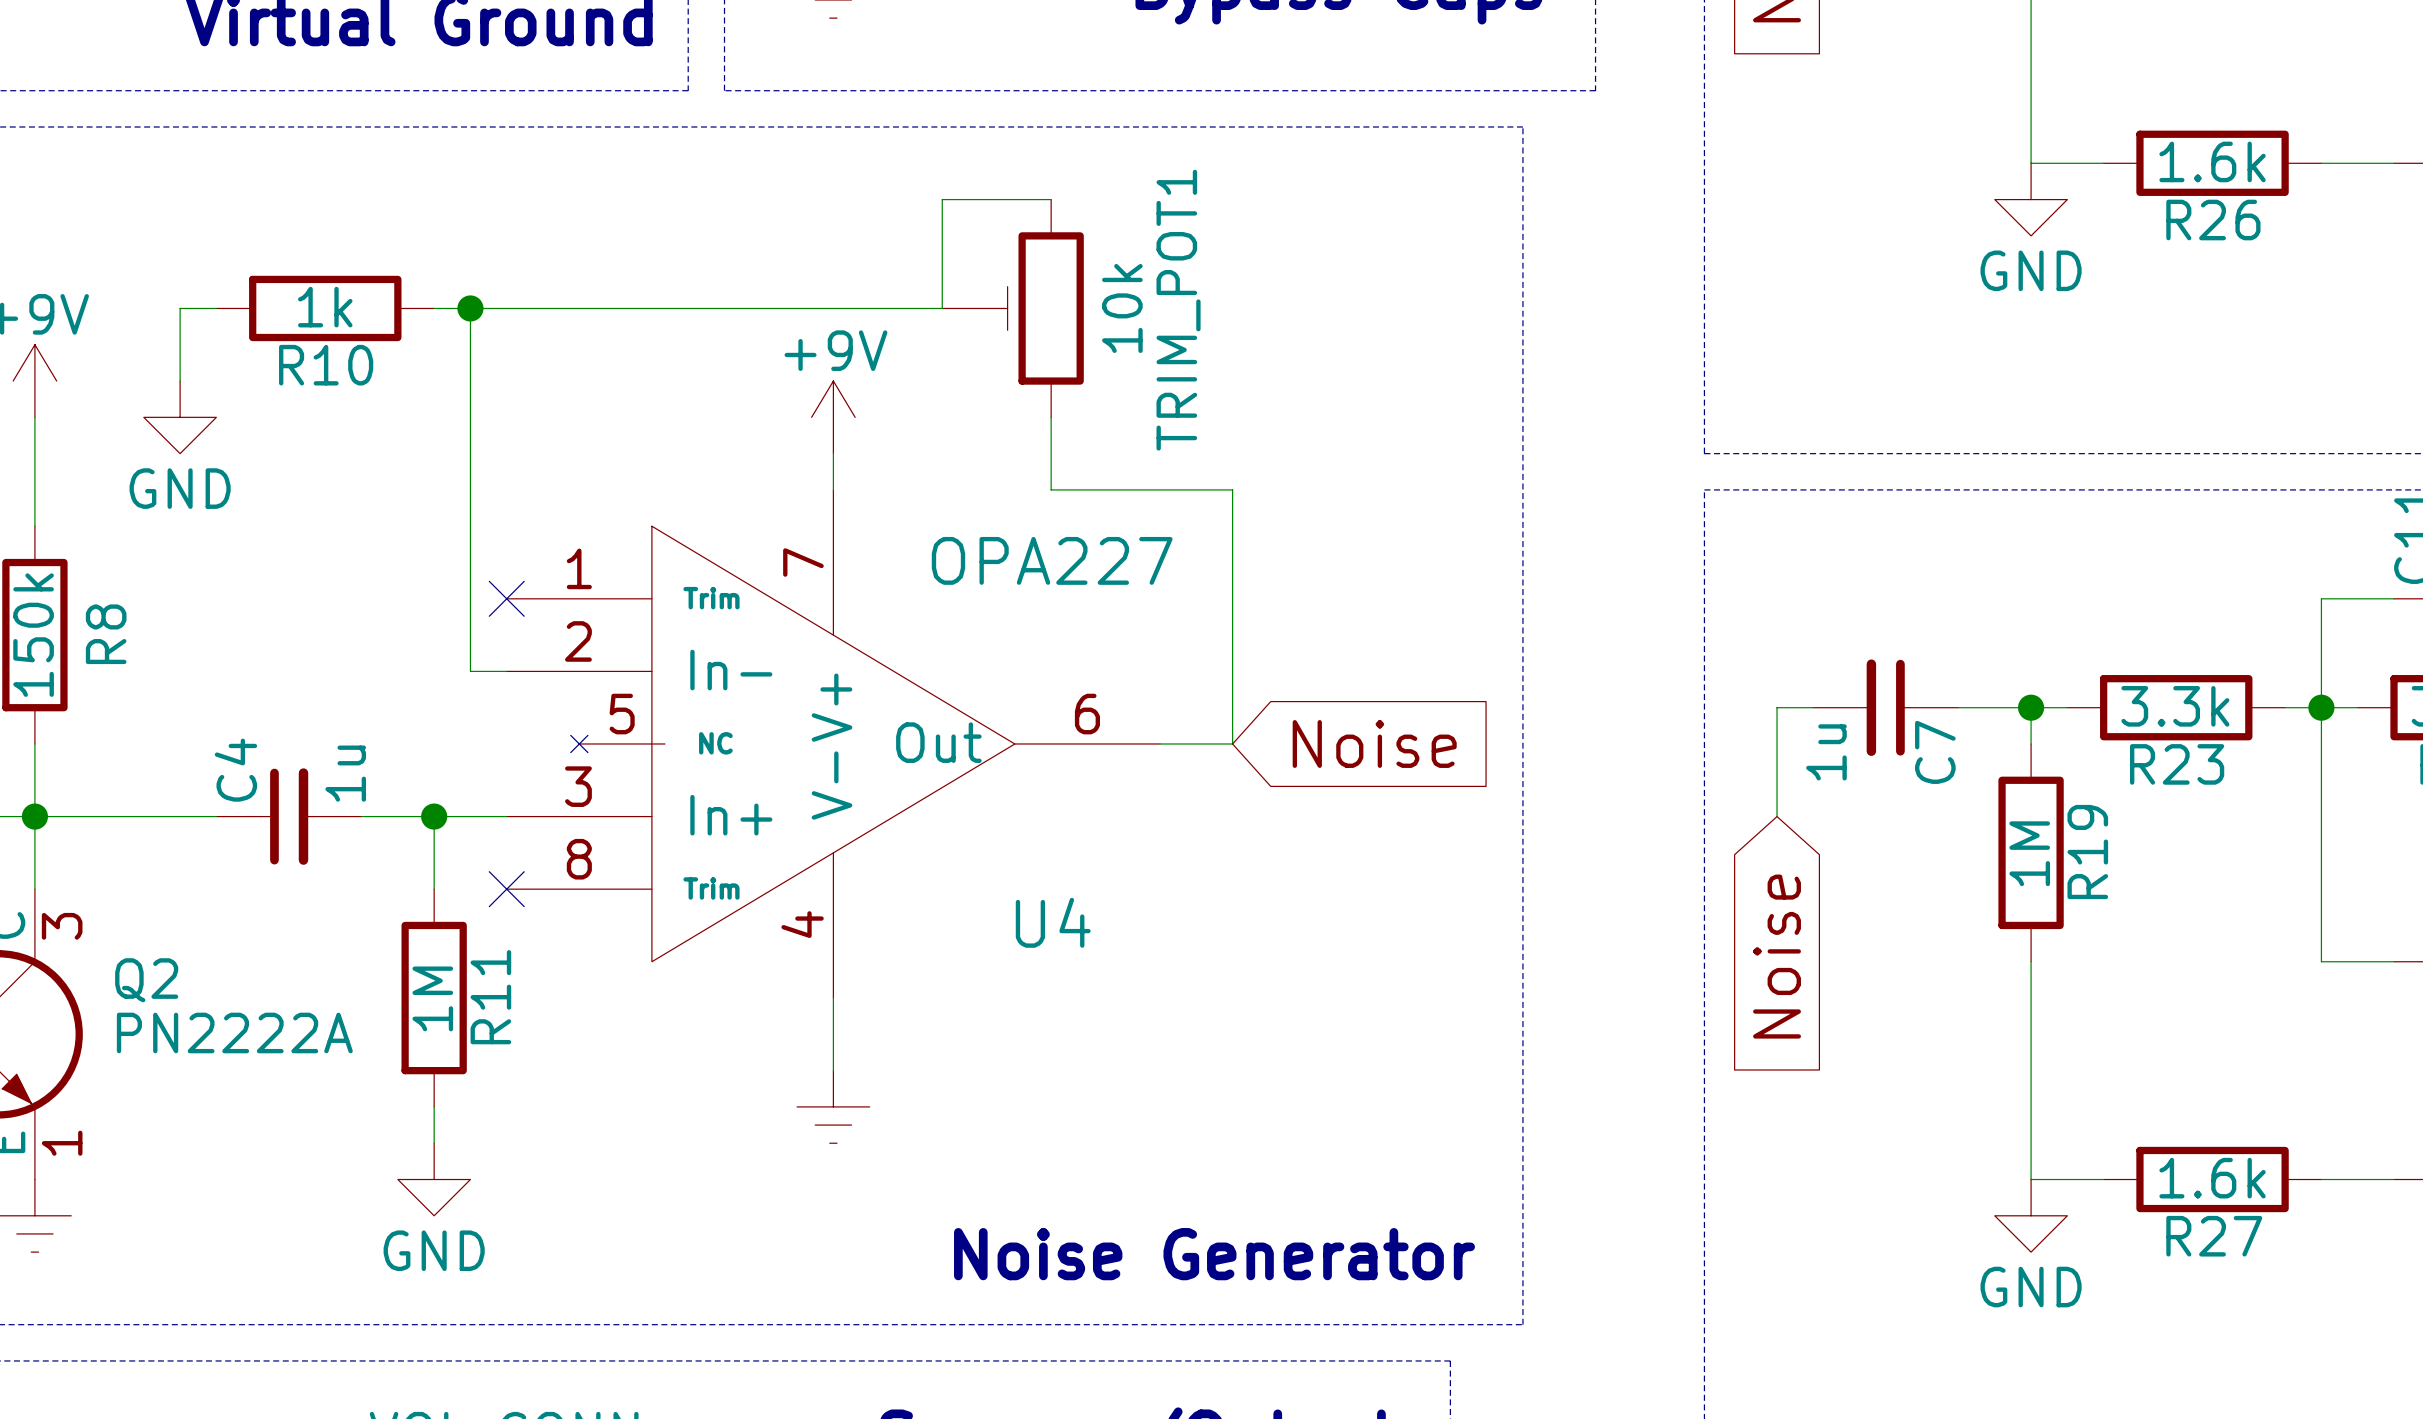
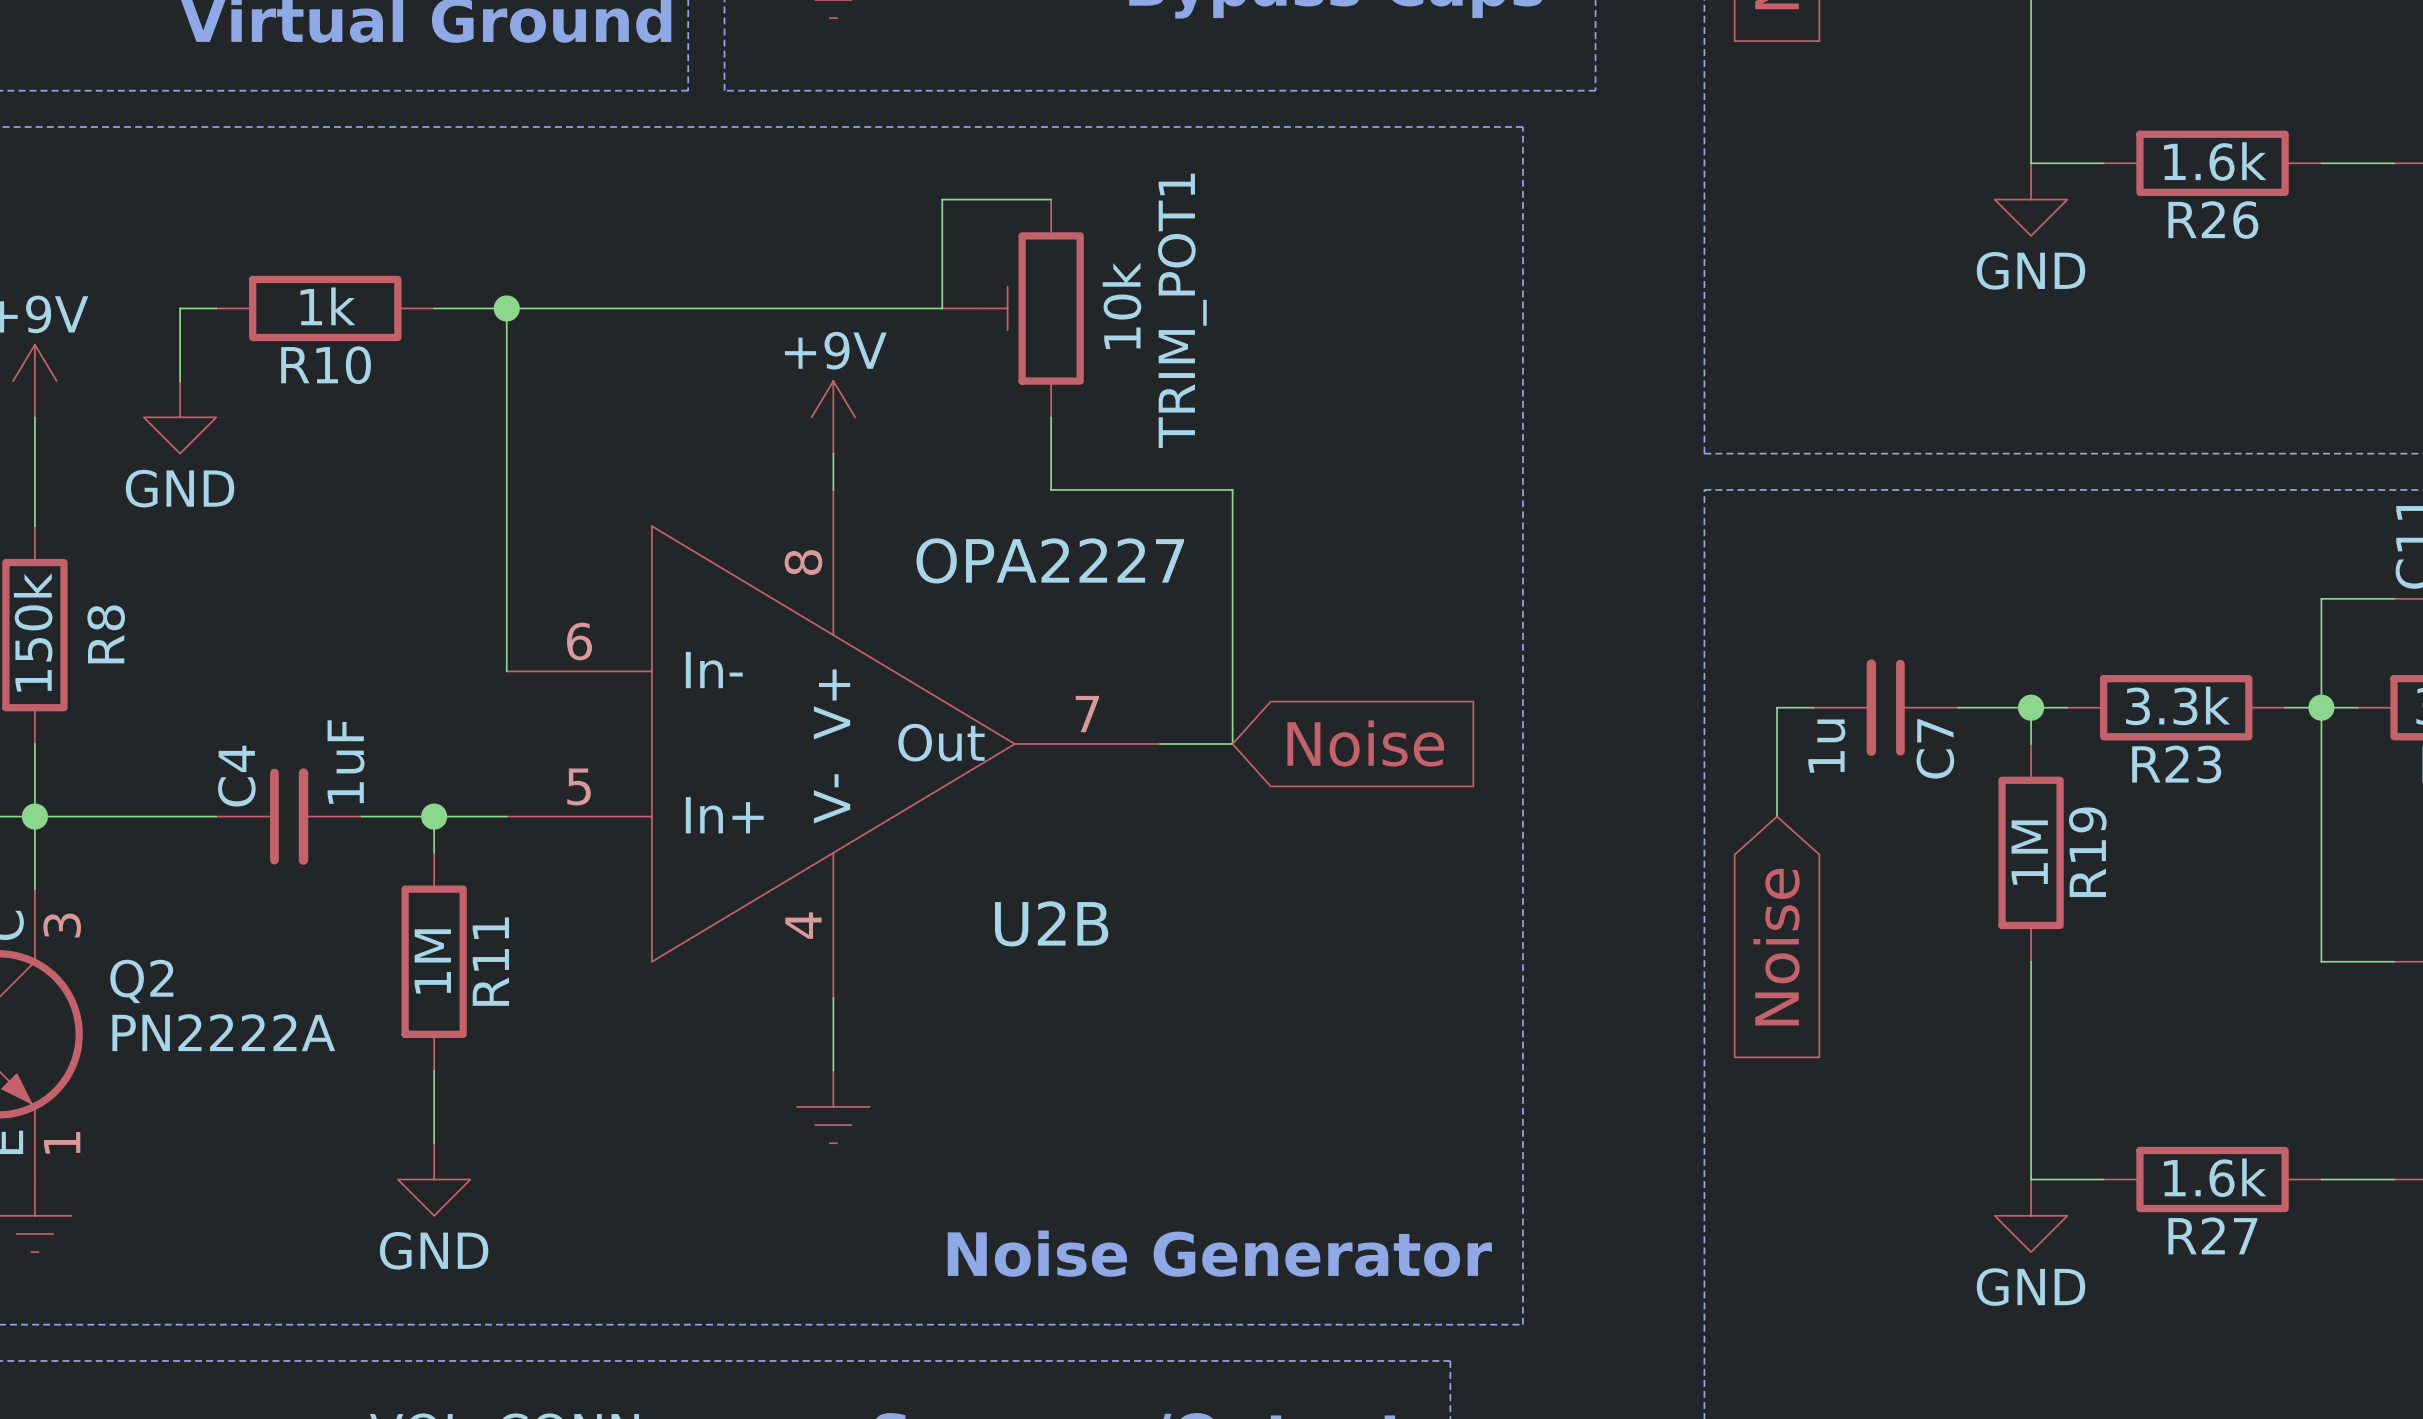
wire: (470, 308) (470, 671) (506, 671) -> (506, 308) (506, 671)
junction position: (470, 308) -> (506, 308)
no-connect mark: (506, 598) -> none
U4: OPA227 (833, 743) -> none
U2B: none -> OPA2227 (833, 743)
C4 value: 1u (345, 773) -> 1uF (346, 762)
no-connect mark: (506, 889) -> none
R11 position: (434, 998) -> (434, 961)

